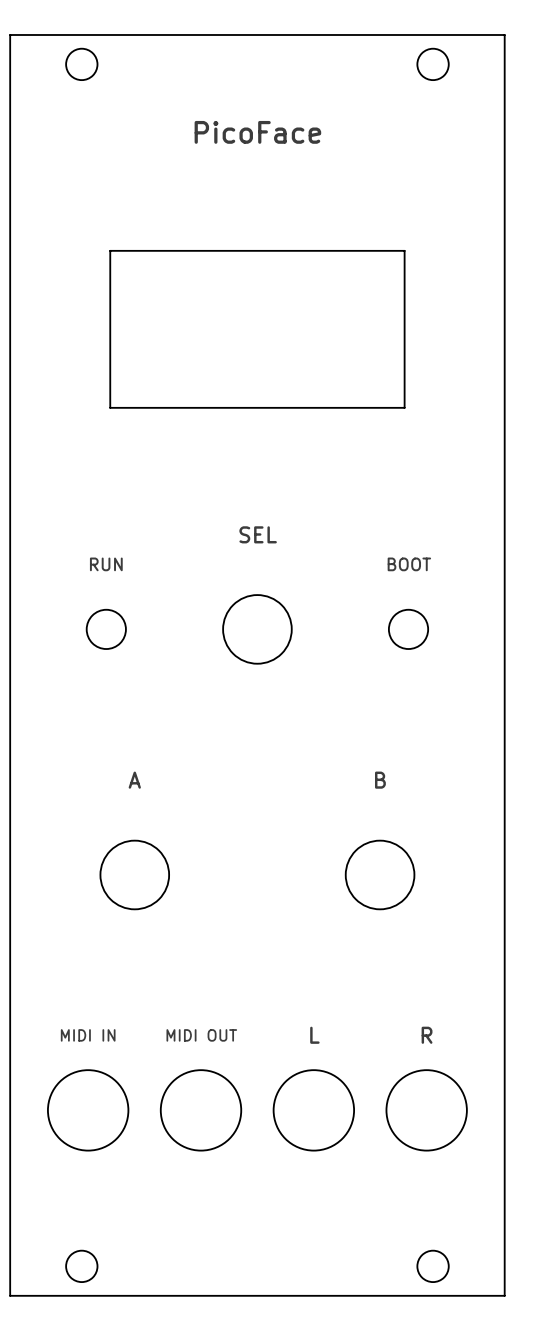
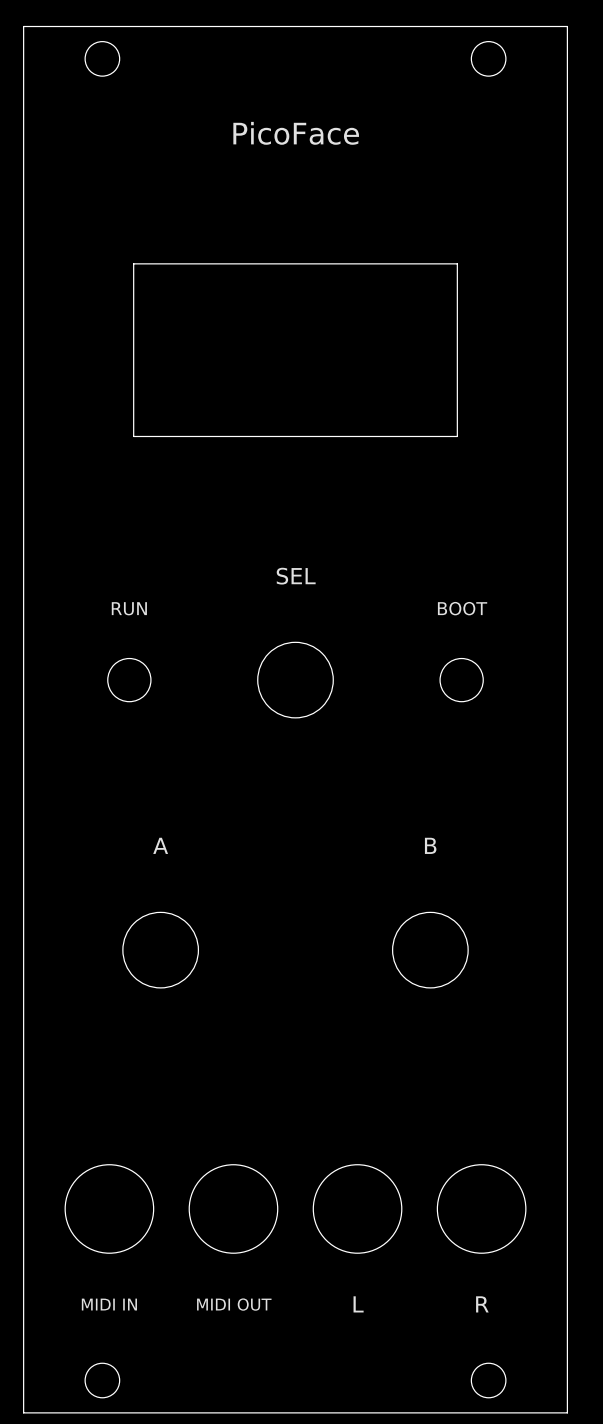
text position: MIDI IN (88, 1035) -> MIDI IN (109, 1304)
text position: MIDI OUT (201, 1035) -> MIDI OUT (234, 1304)
text position: L (314, 1035) -> L (358, 1304)
text position: R (427, 1035) -> R (482, 1304)

